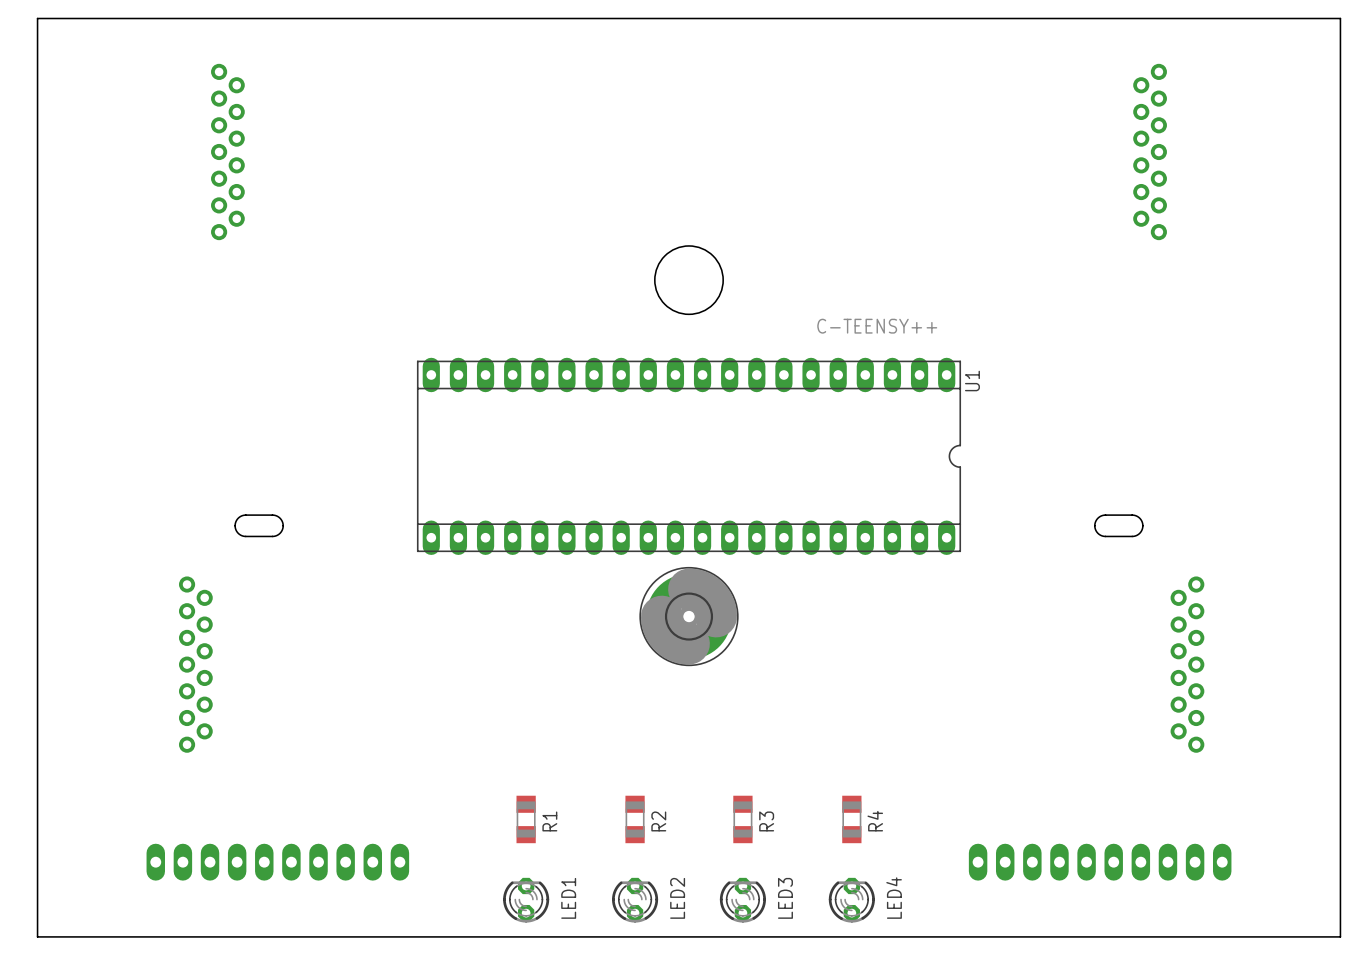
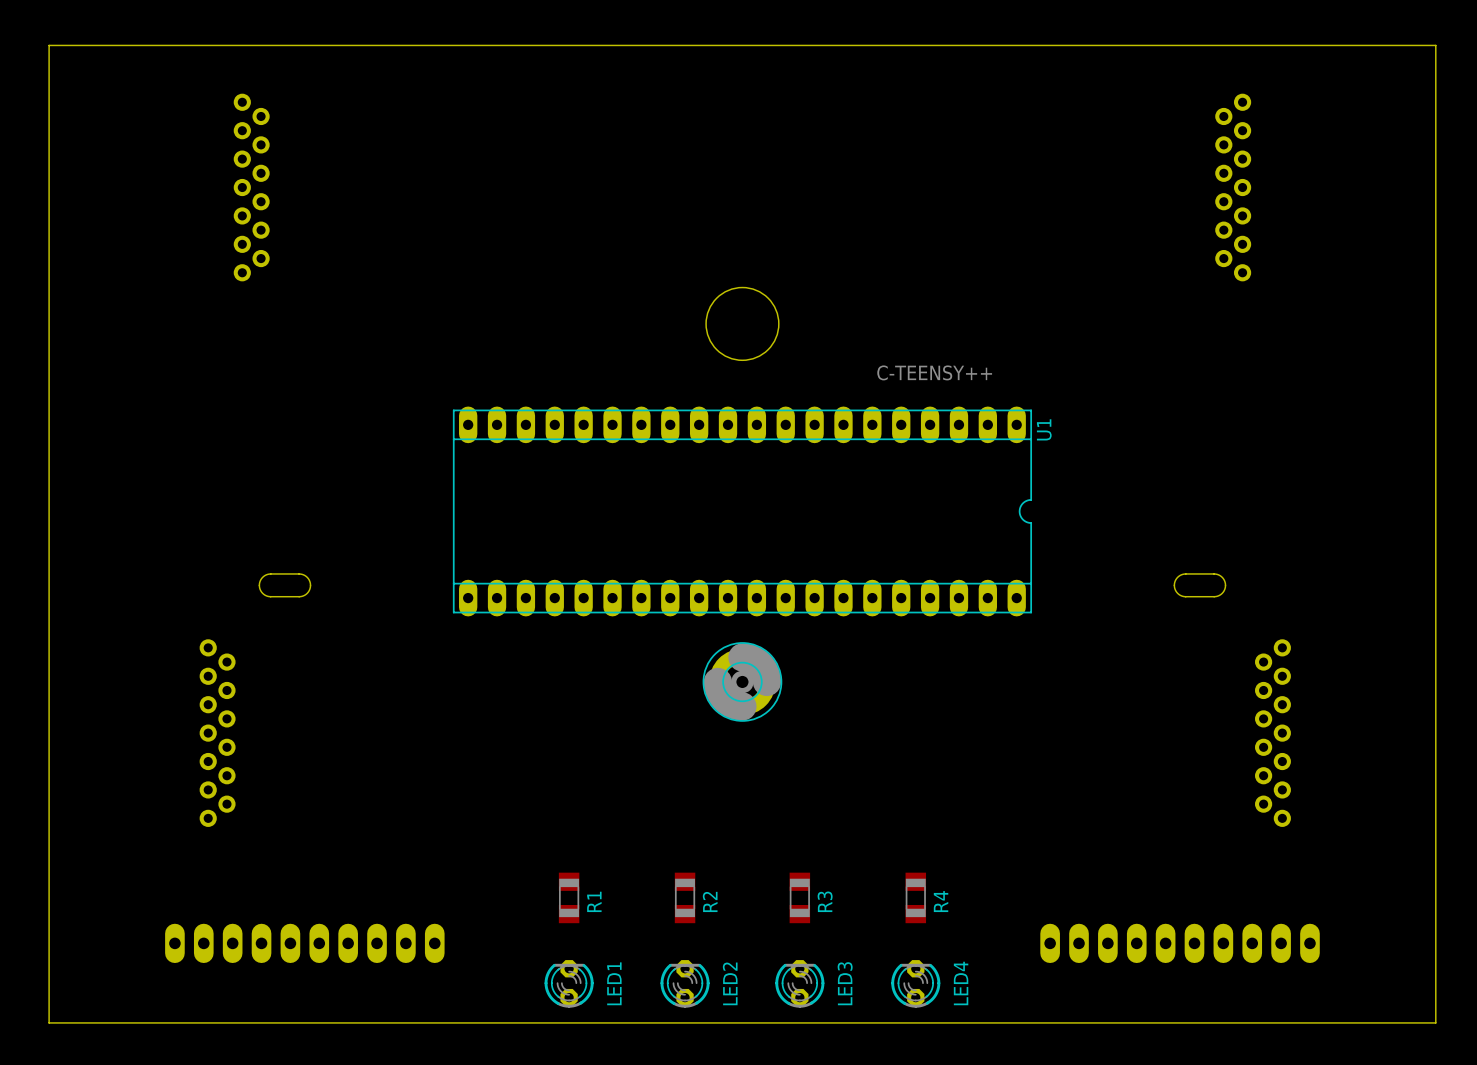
part footprint: [639, 566, 739, 667] -> [702, 642, 783, 722]

